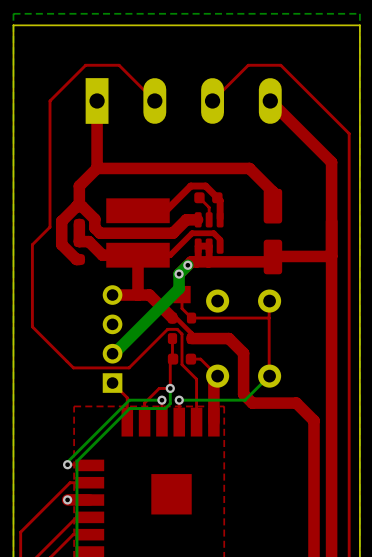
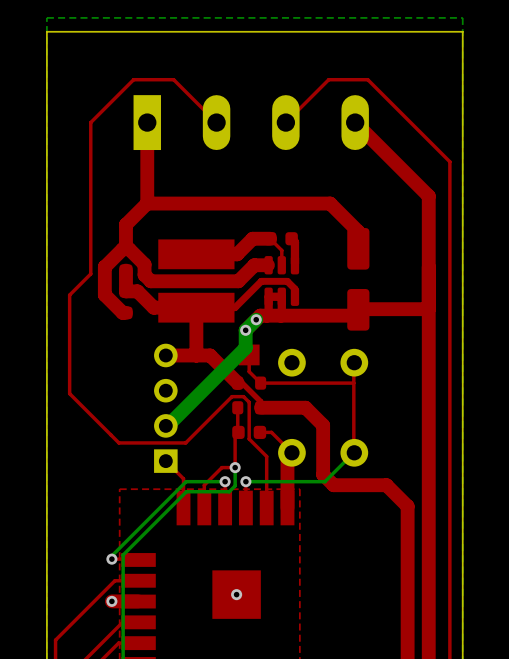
top track: none -> (270, 238) (252, 238) (237, 254) (196, 254)
top track: (217, 197) (205, 186) (190, 186) (166, 210) -> none
via: none -> (236, 594)

